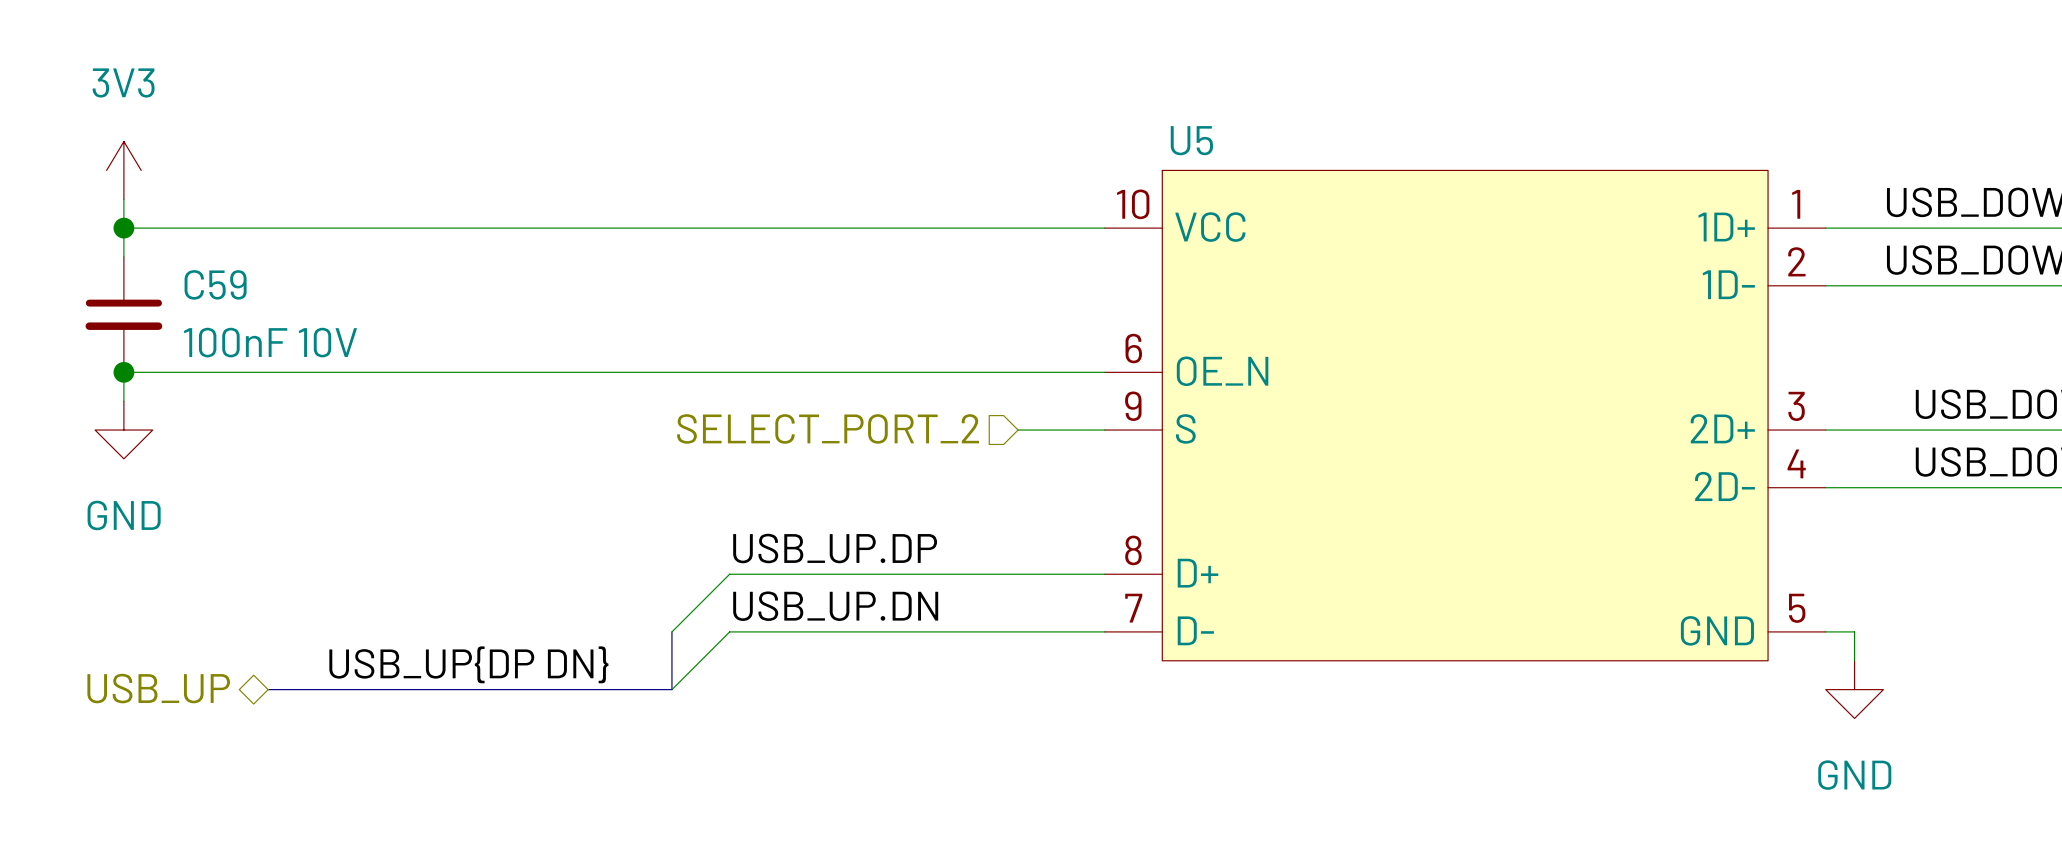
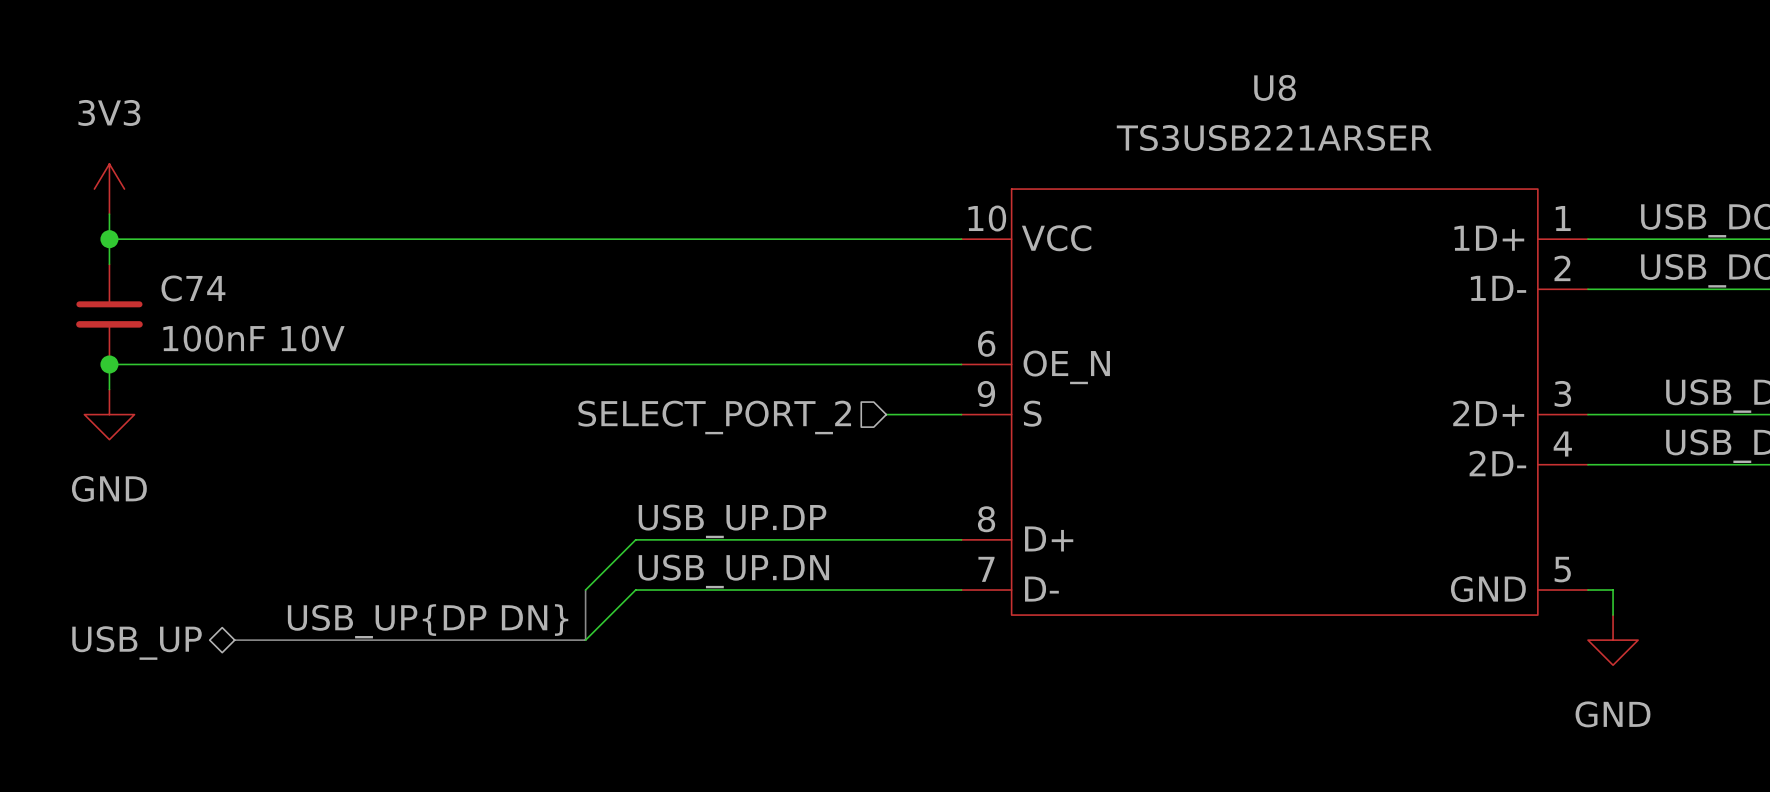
U5 value: none -> TS3USB221ARSER (1274, 138)
U5 name: U5 (1191, 140) -> U8 (1275, 87)
C59 name: C59 (215, 284) -> C74 (193, 288)

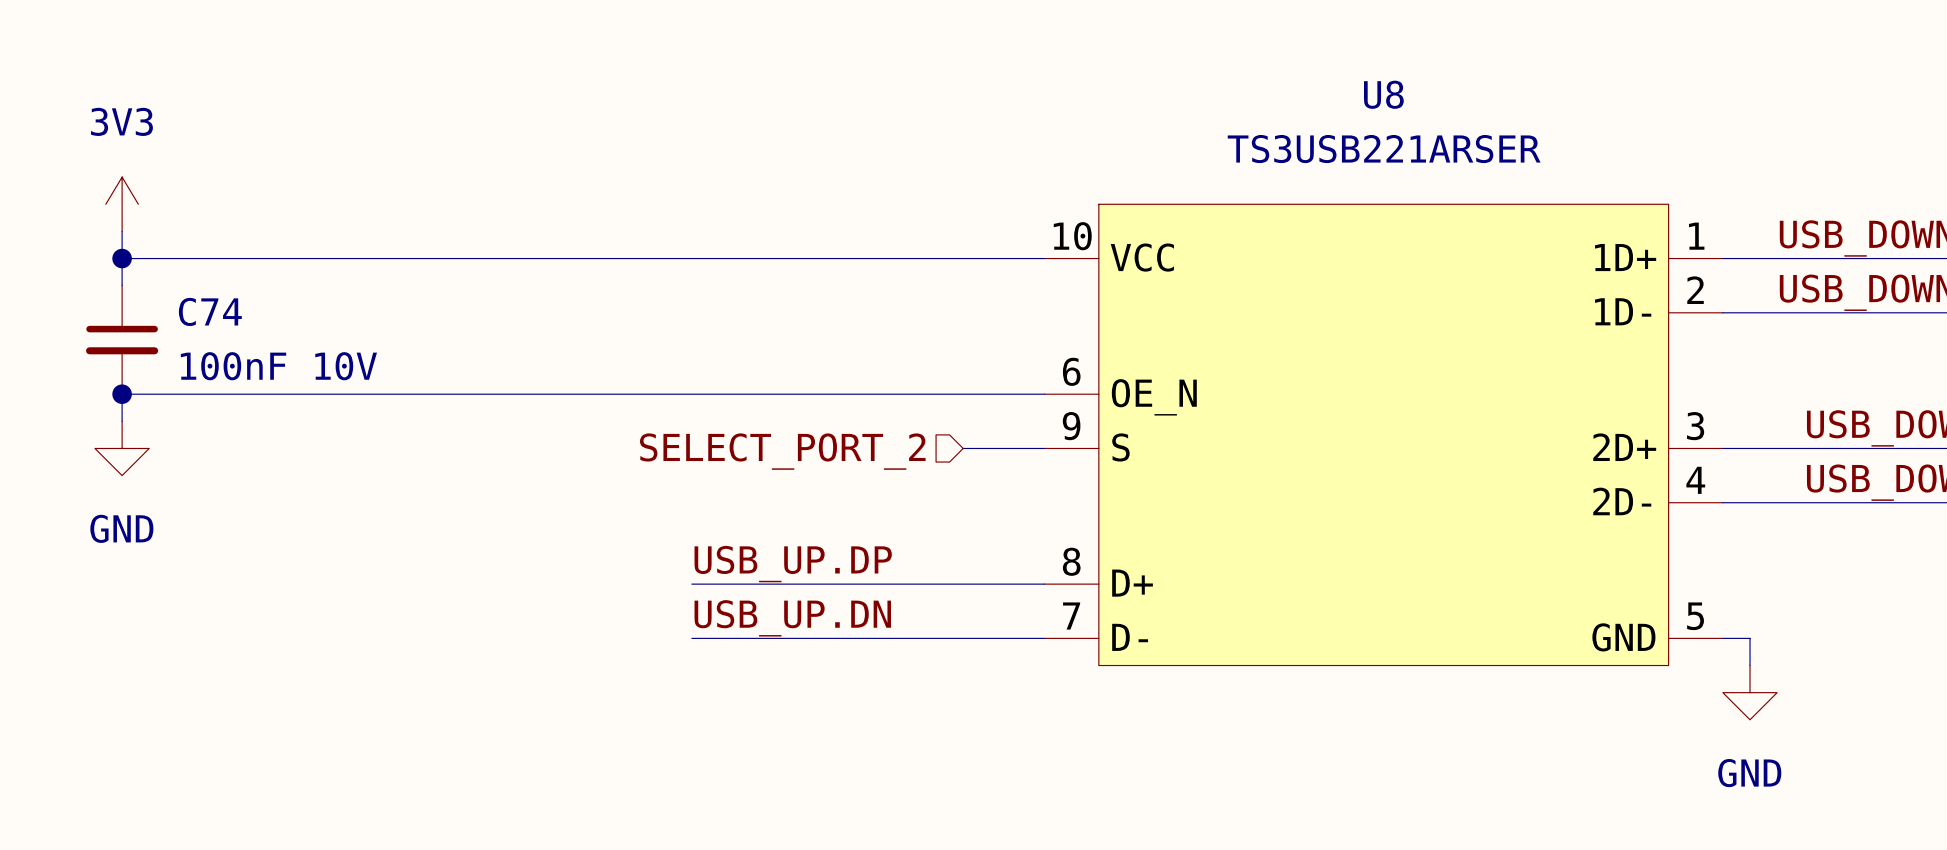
wire: (635, 539) (585, 590) -> none
bus: (585, 590) (585, 640) (234, 640) -> none
wire: (635, 590) (585, 640) -> none
label: USB_UP{DP DN} (428, 621) -> none
hierarchical label: USB_UP (137, 643) -> none

